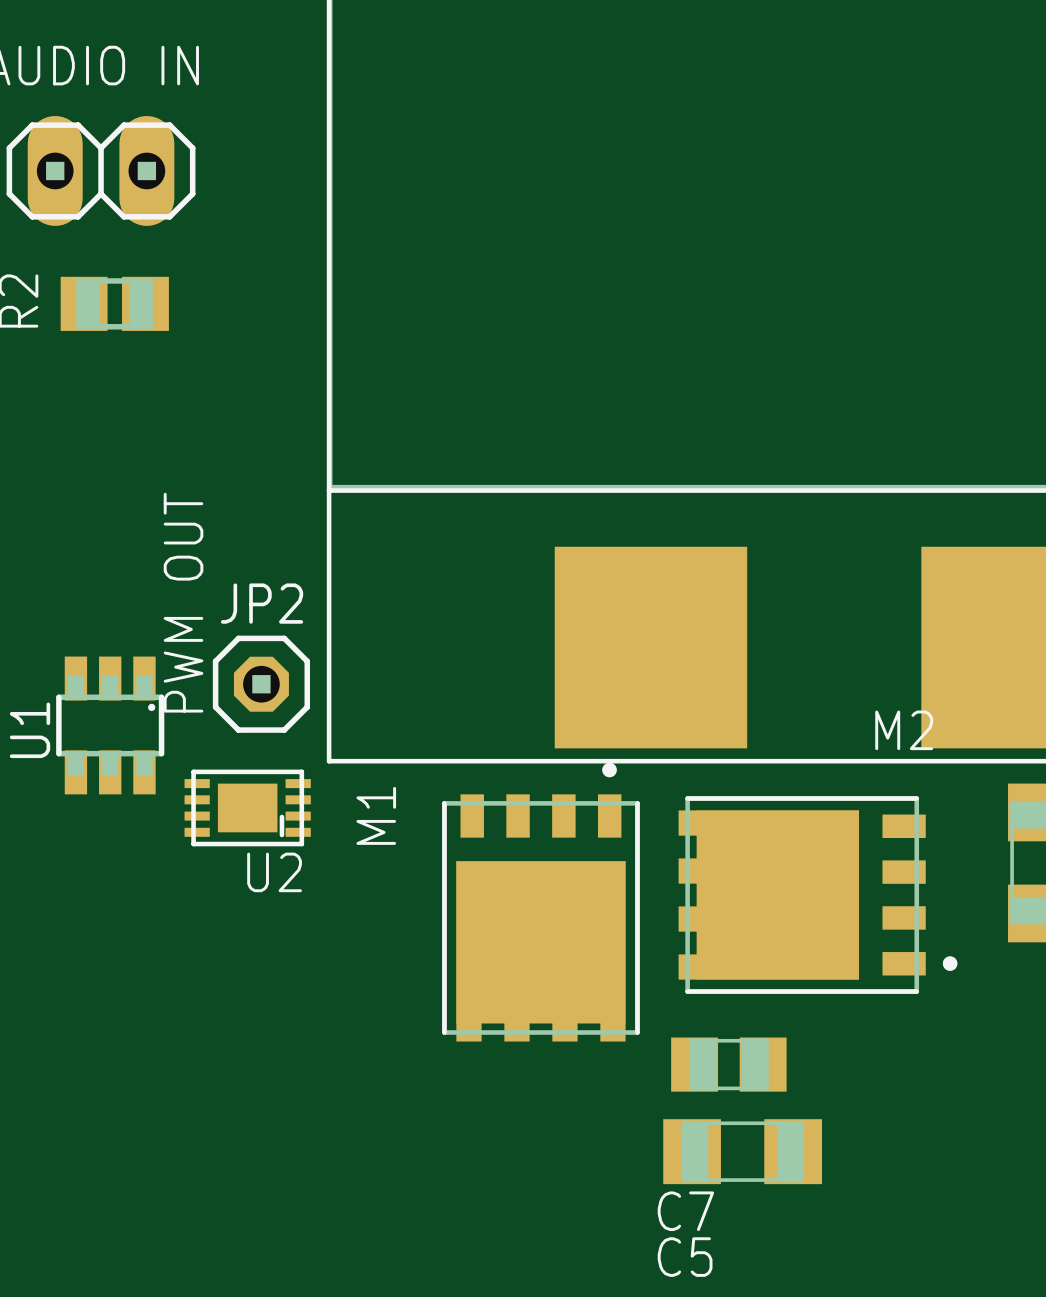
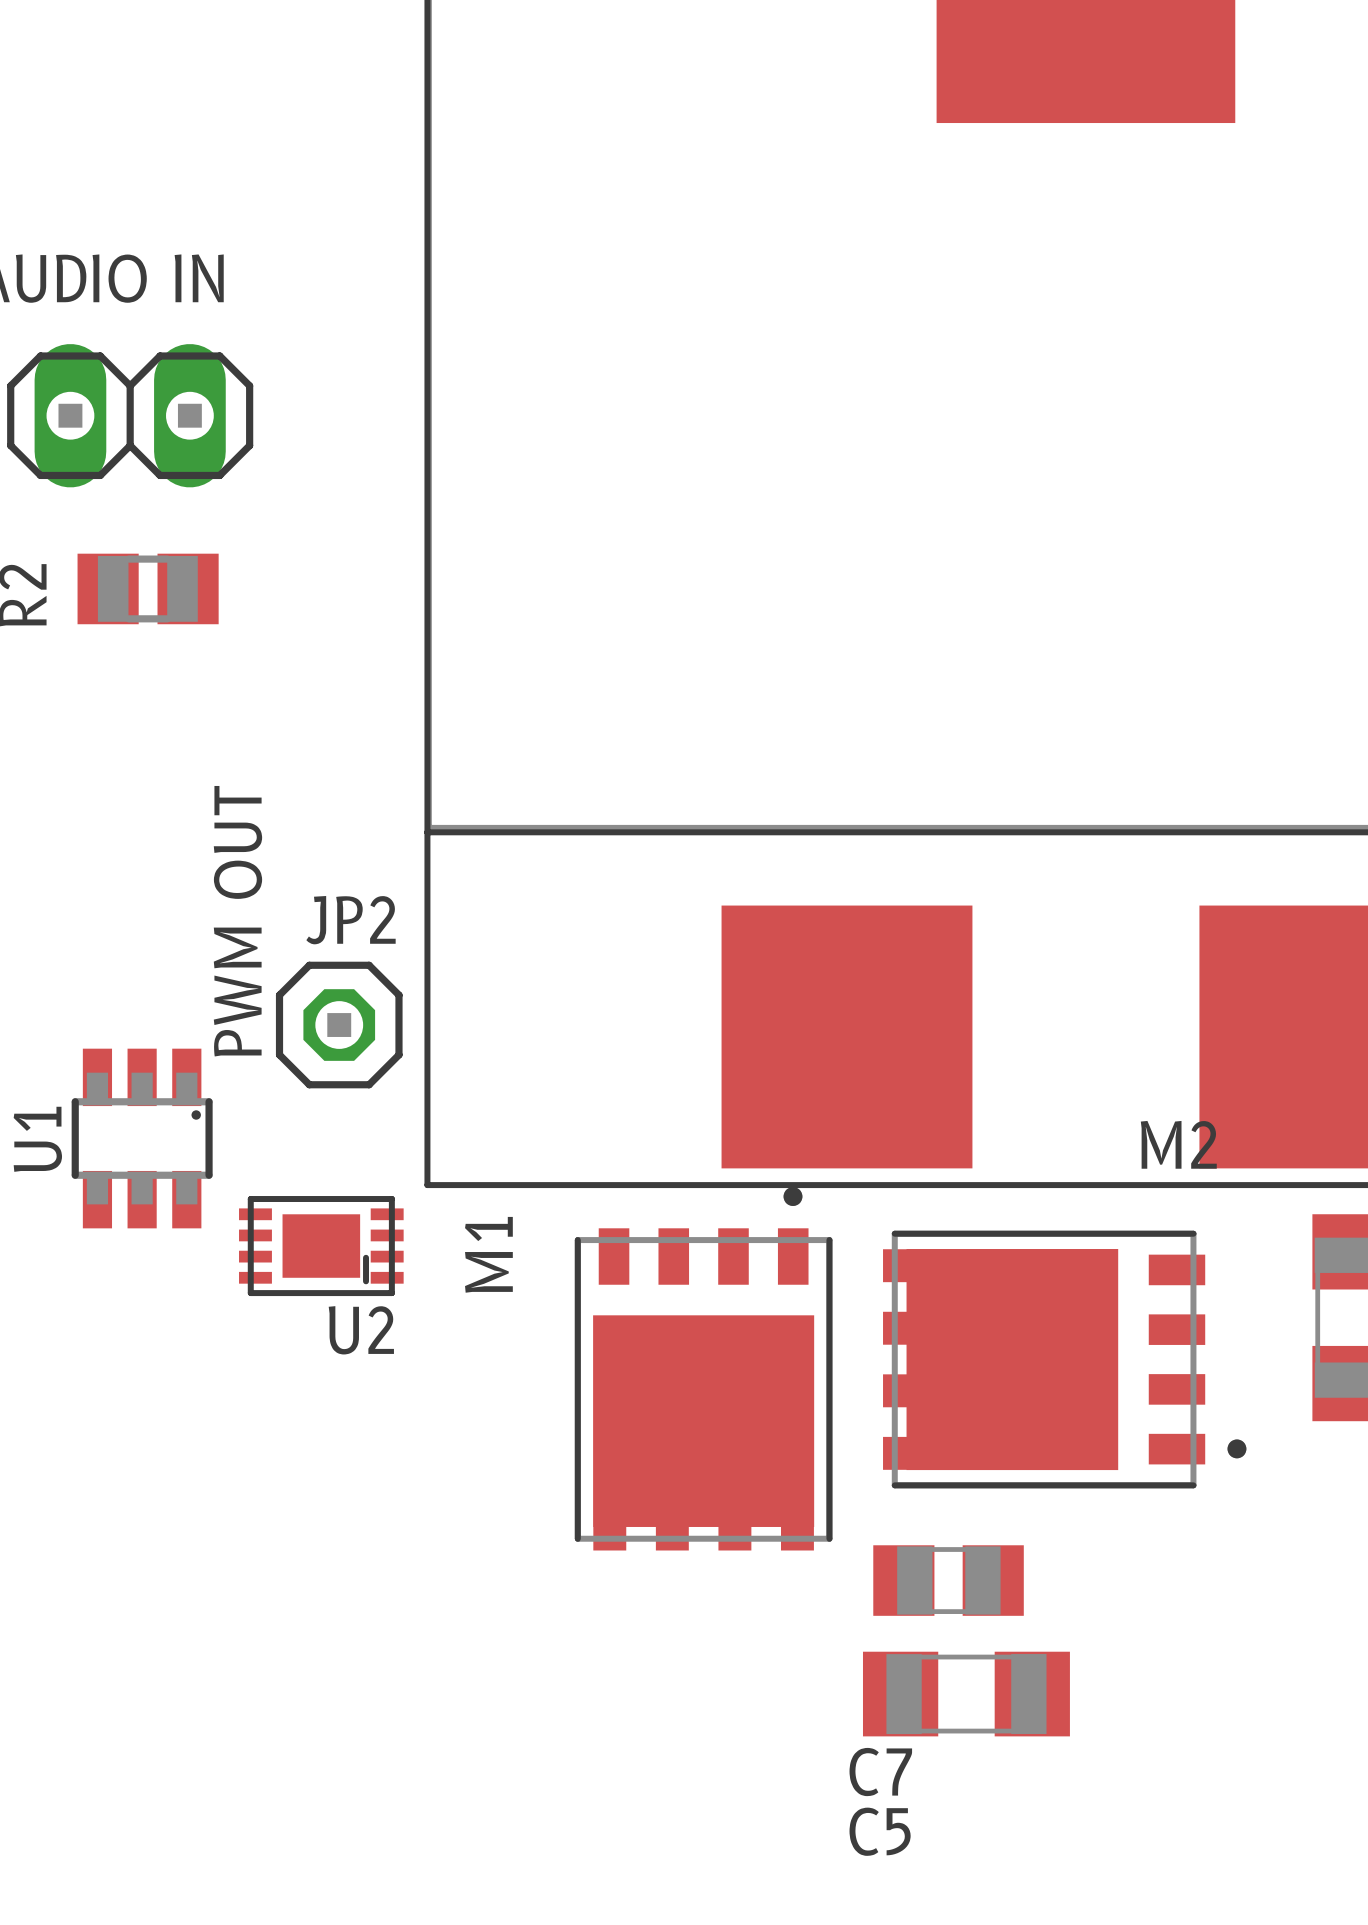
text position: PWM OUT (183, 602) -> PWM OUT (237, 921)
JP2 position: (261, 684) -> (339, 1025)

